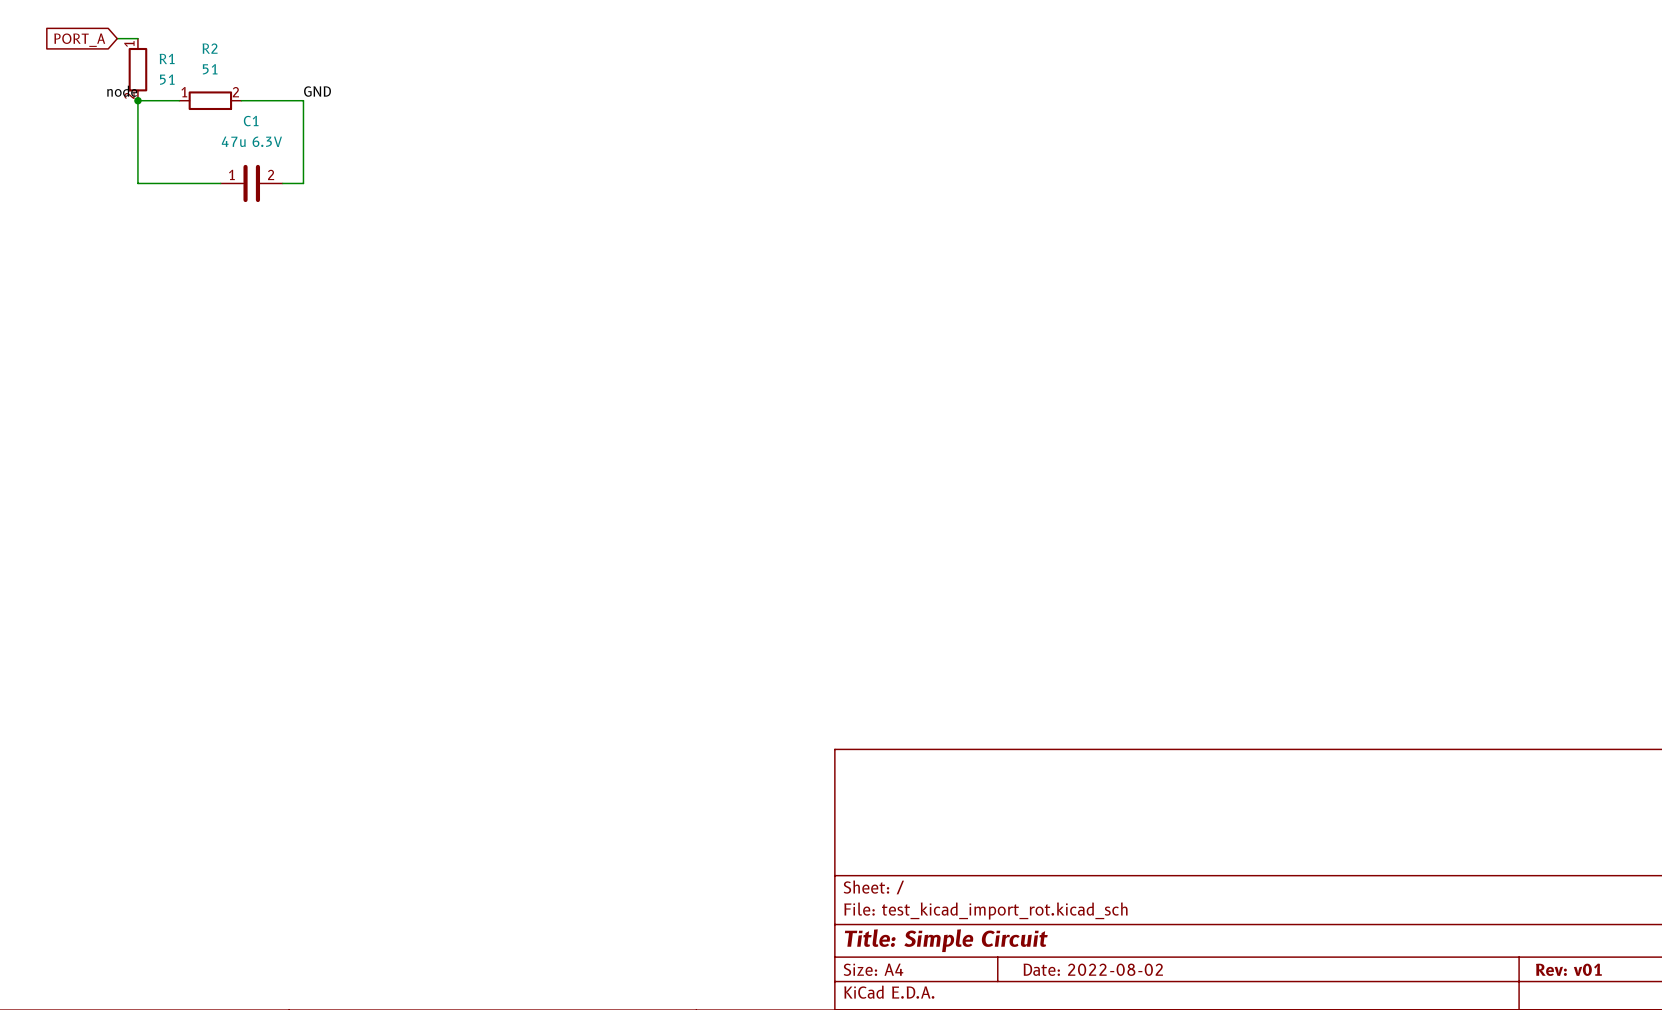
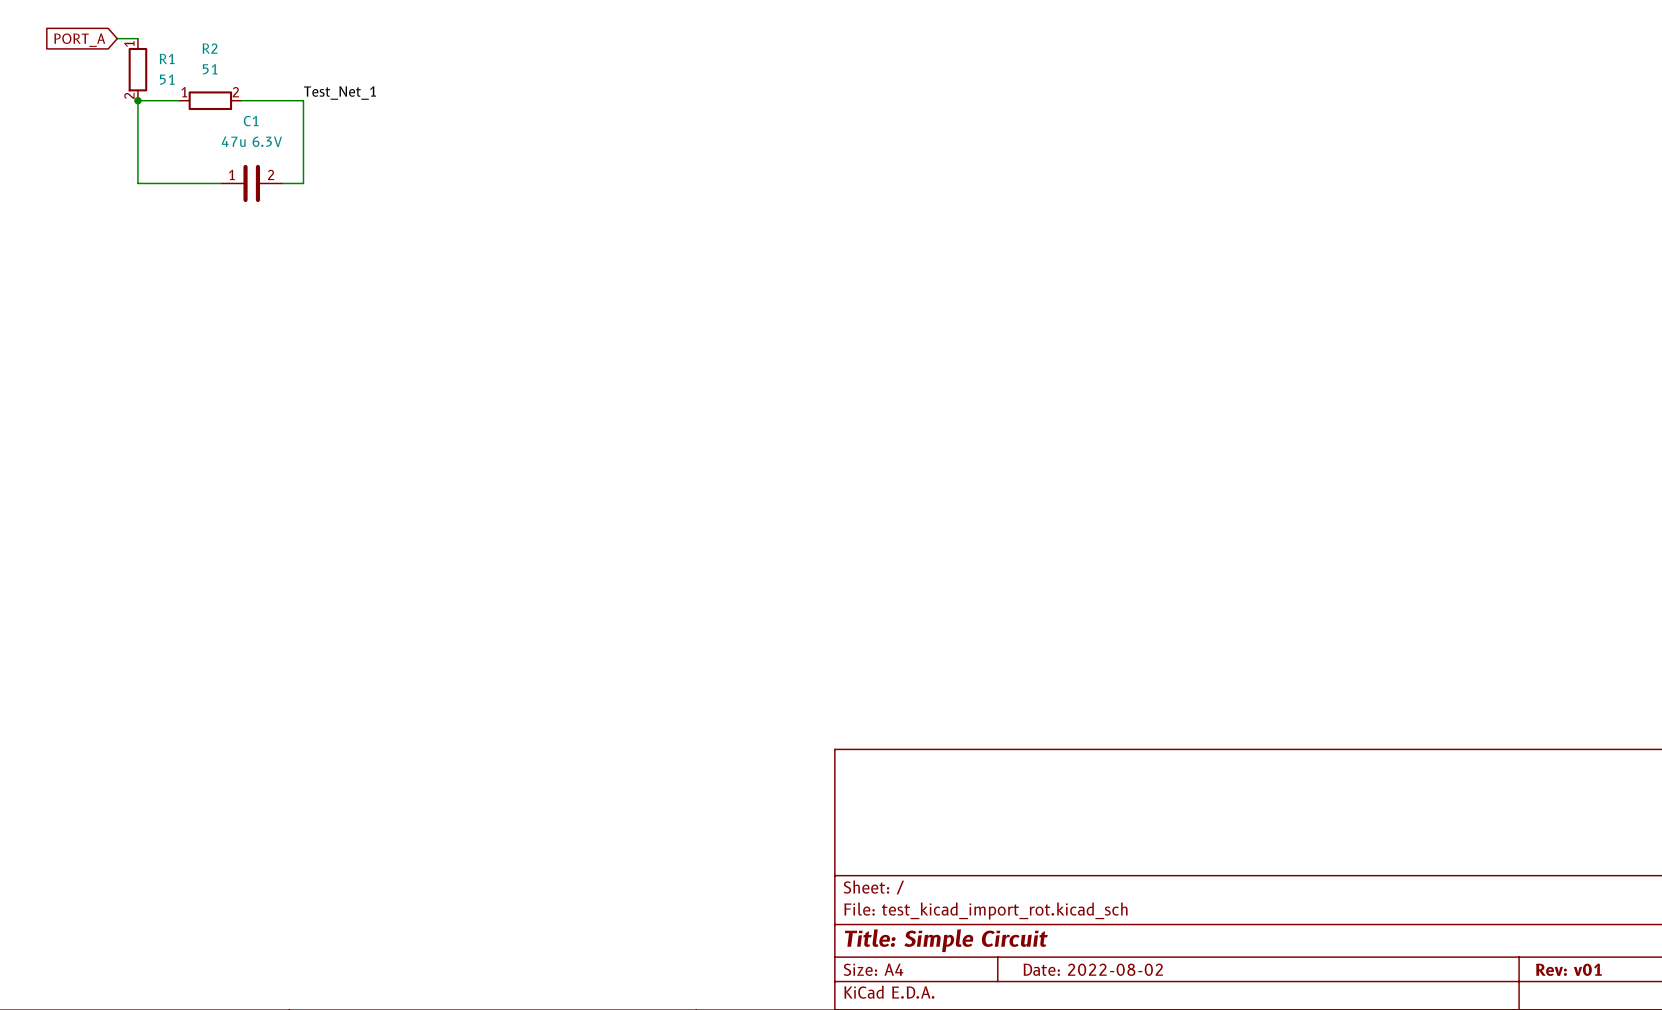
label: node (122, 91) -> none
label: GND (317, 91) -> Test_Net_1 (339, 93)

